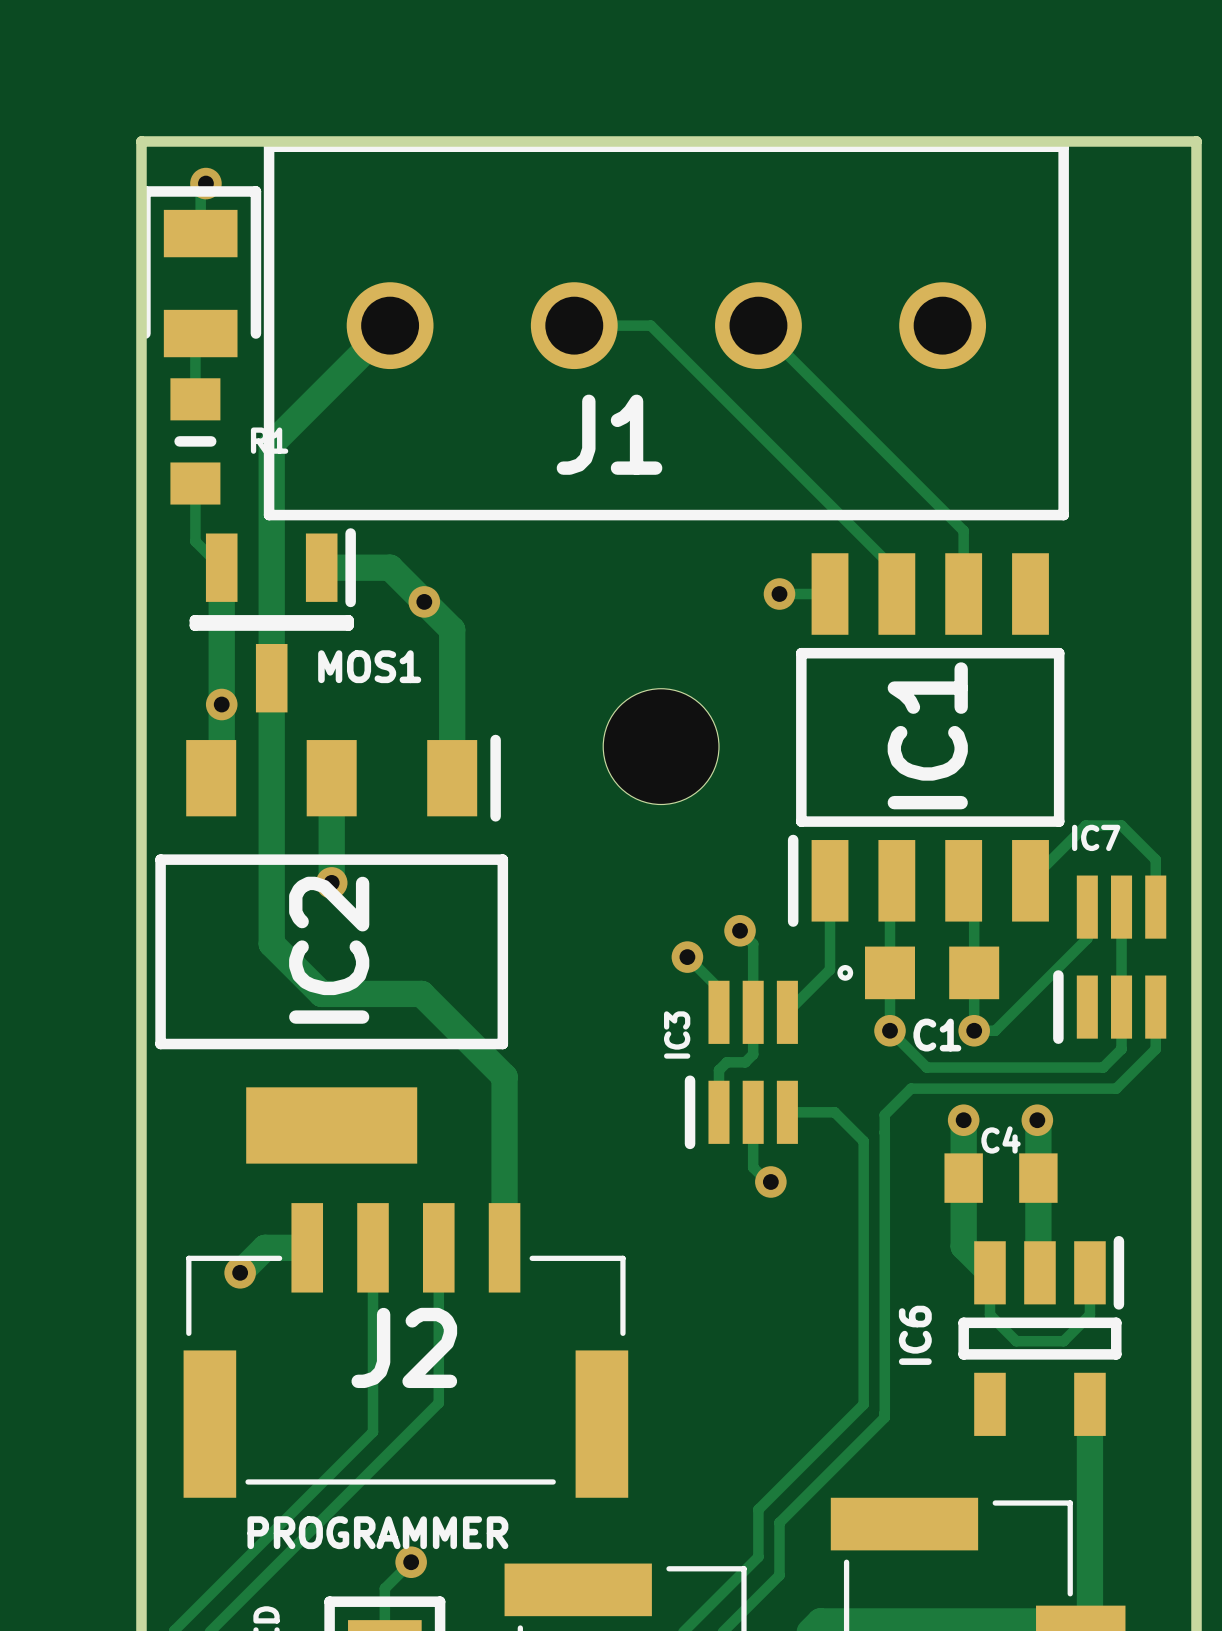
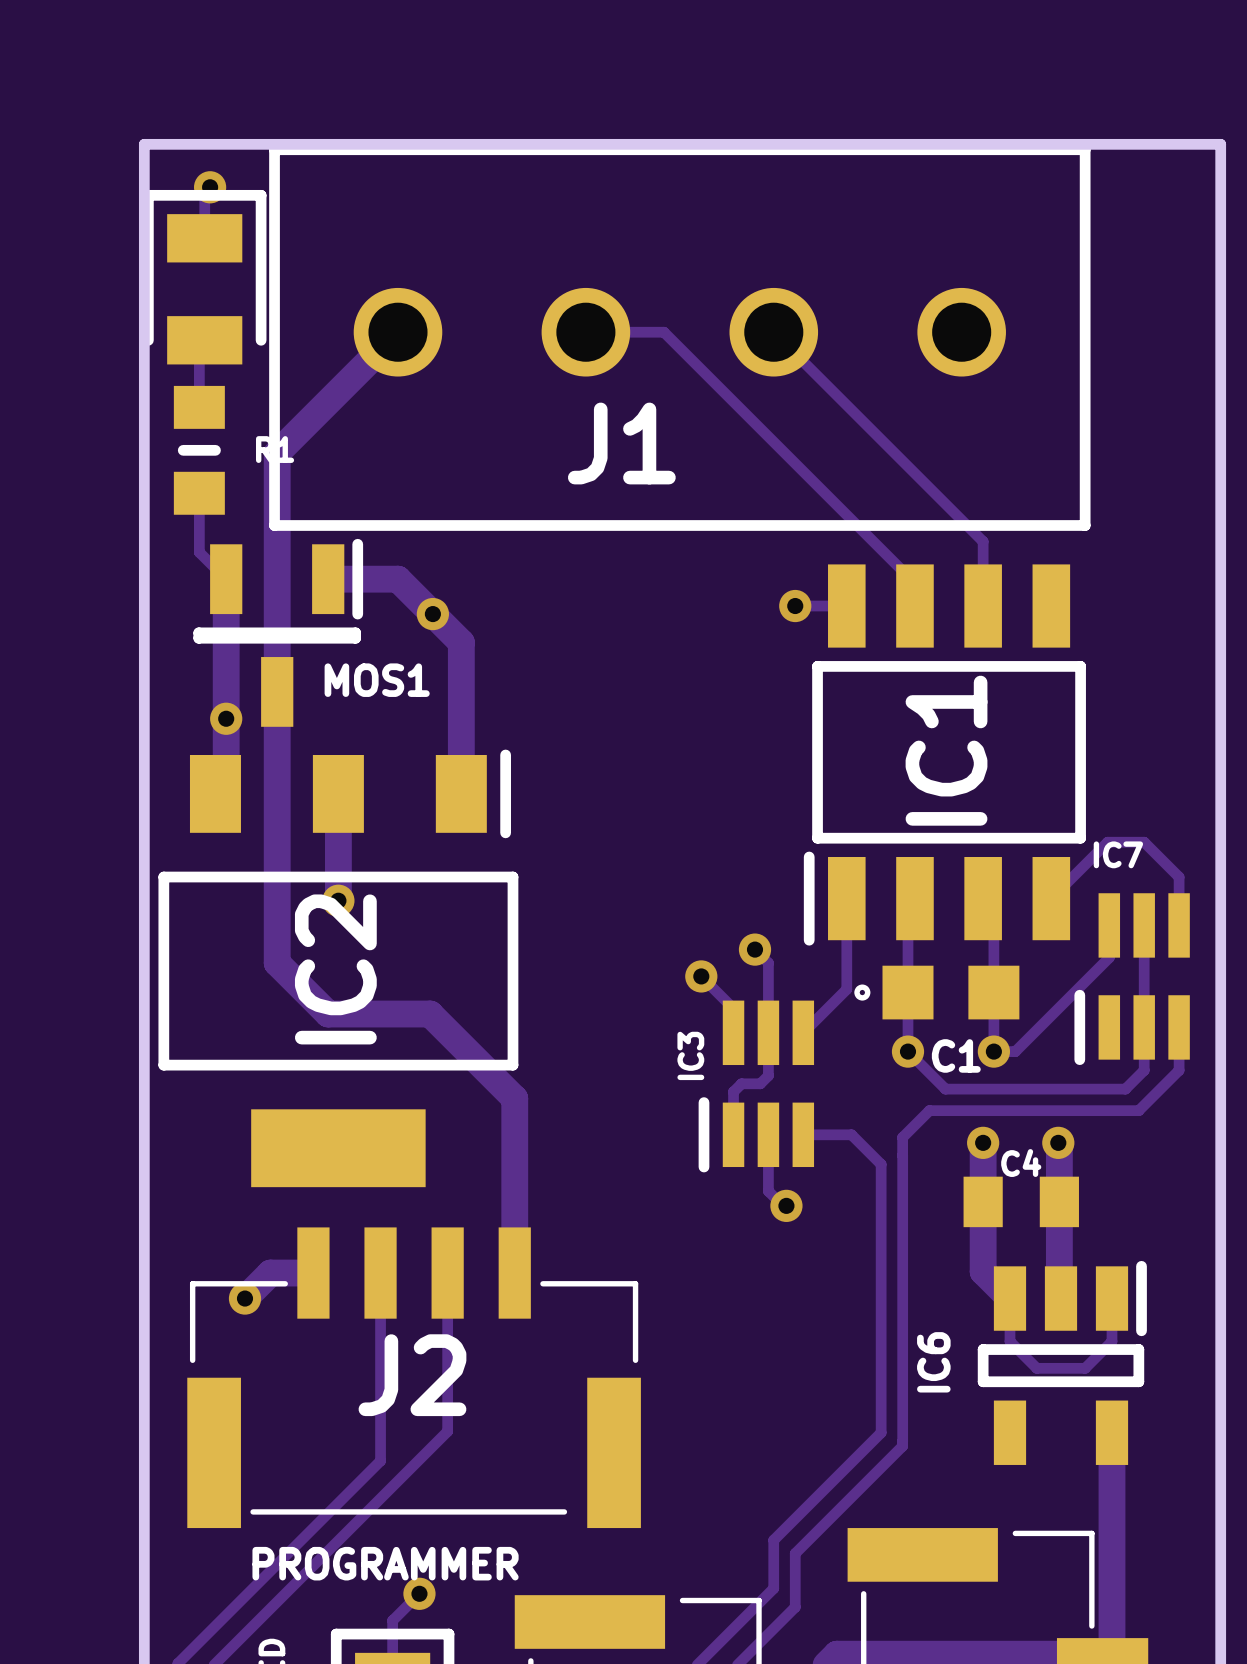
part: (661, 746) -> none

